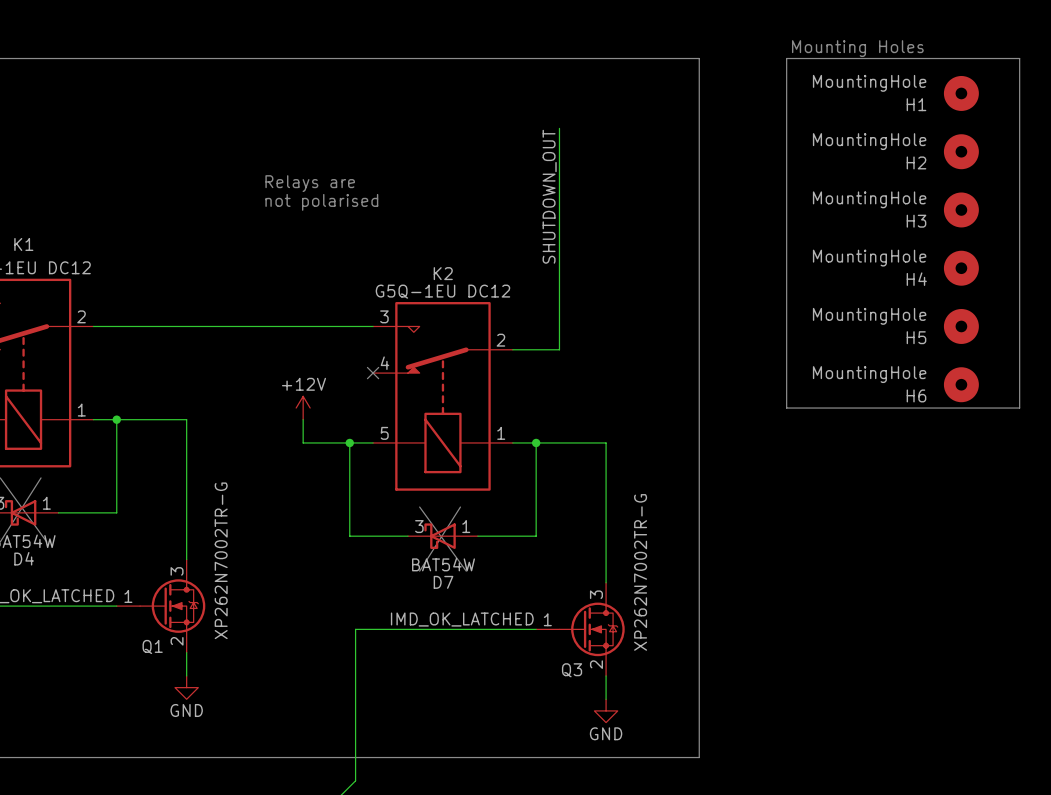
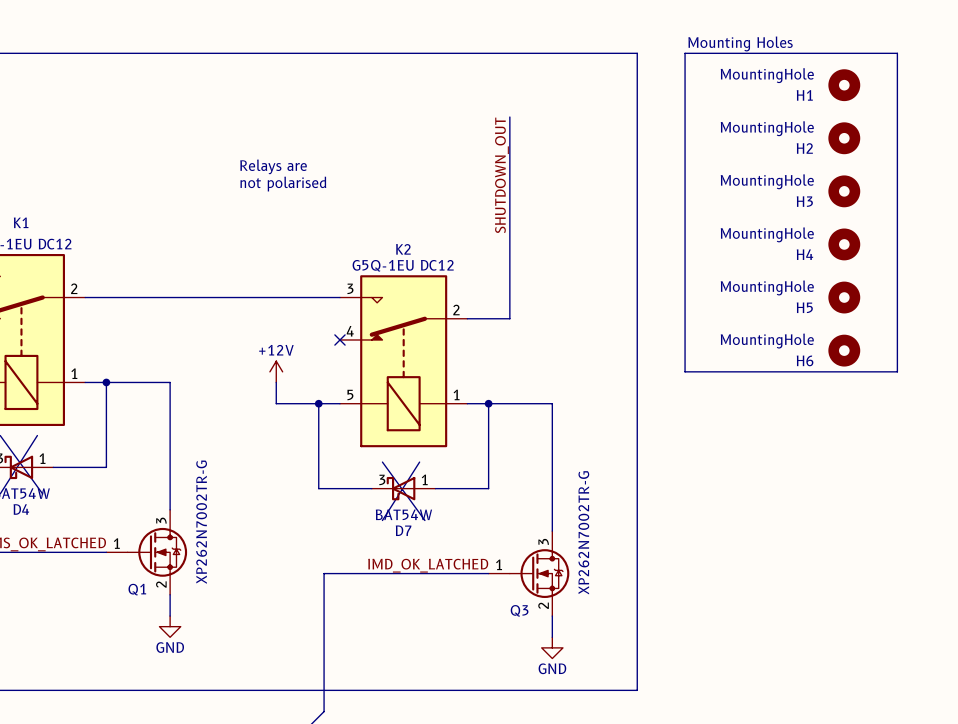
text position: Mounting Holes (857, 48) -> Mounting Holes (740, 43)
line: (786, 58) (786, 408) -> (716, 53) (685, 53) (685, 371) (716, 371)
line: (984, 58) (1019, 58) (1019, 408) (984, 408) -> (897, 53) (897, 371)
H1 position: (961, 93) -> (844, 85)
H2 position: (961, 151) -> (844, 138)
H3 position: (961, 209) -> (844, 191)
H4 position: (961, 268) -> (844, 244)
H5 position: (961, 326) -> (844, 297)
H6 position: (961, 384) -> (844, 350)

